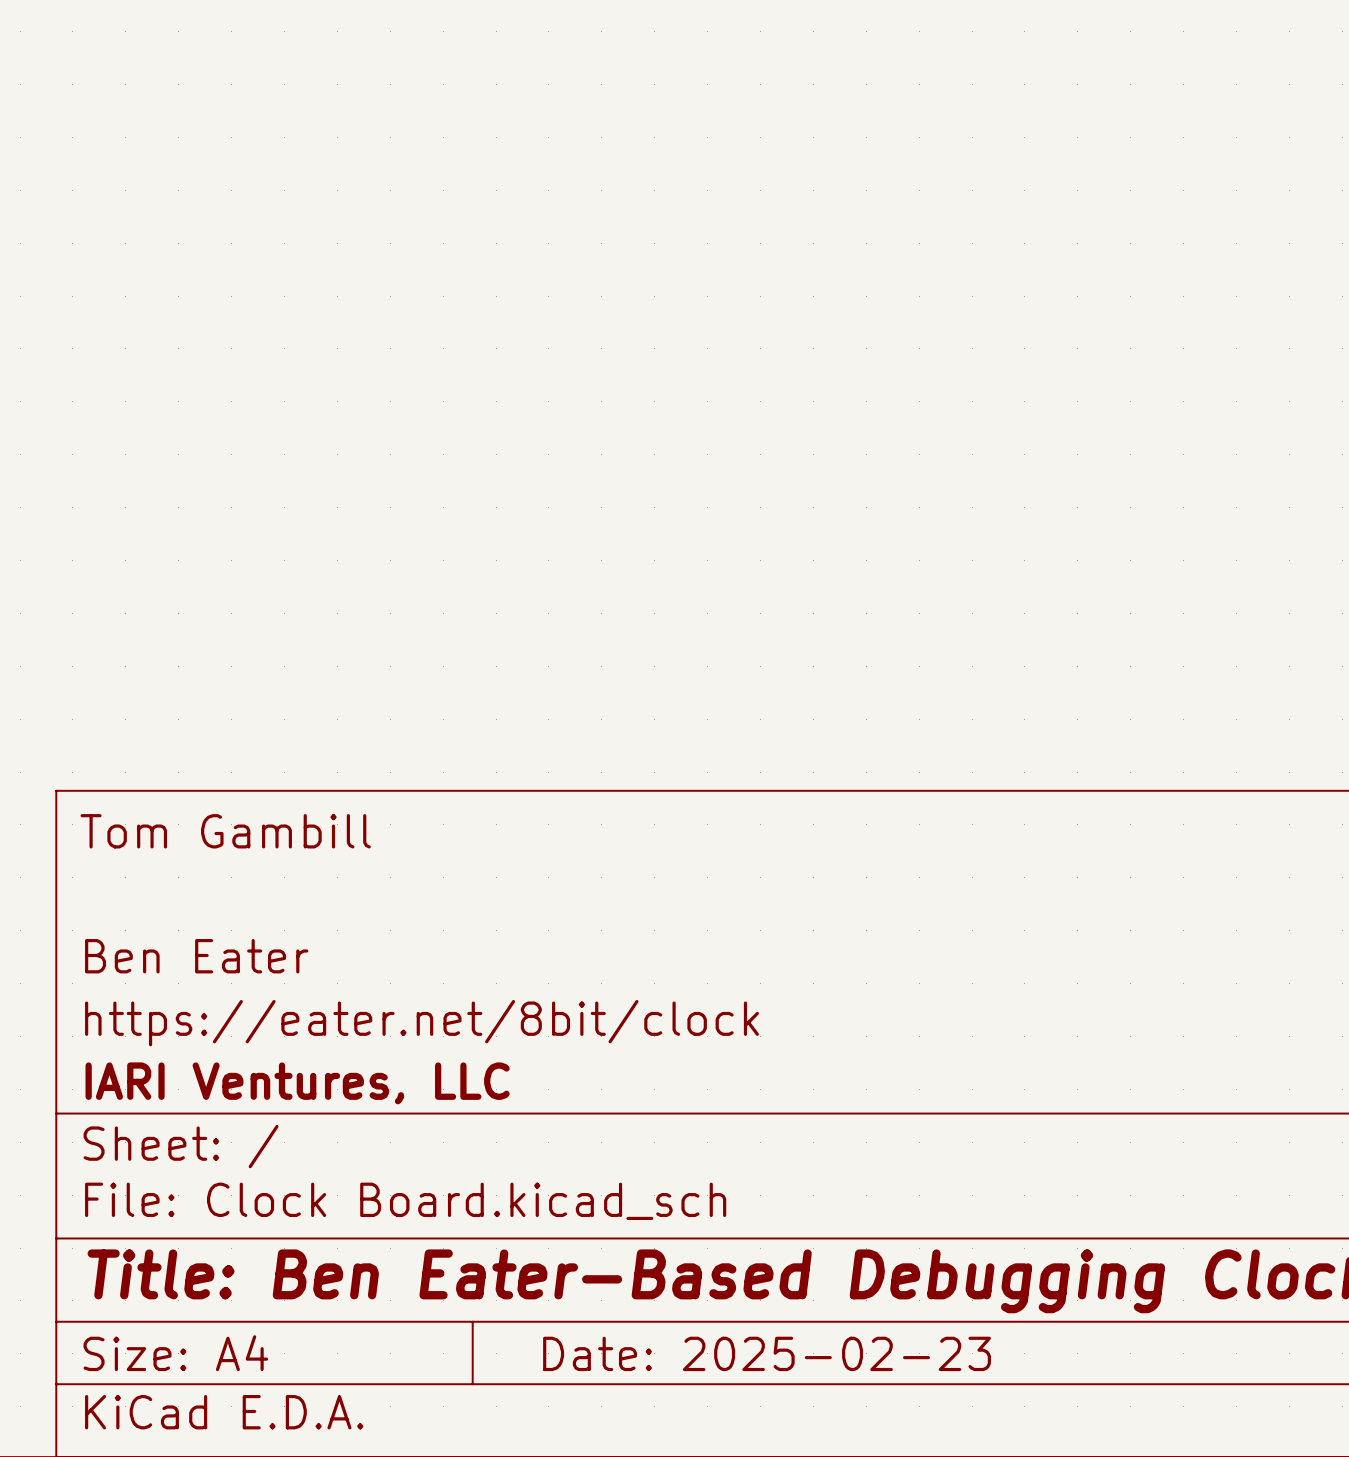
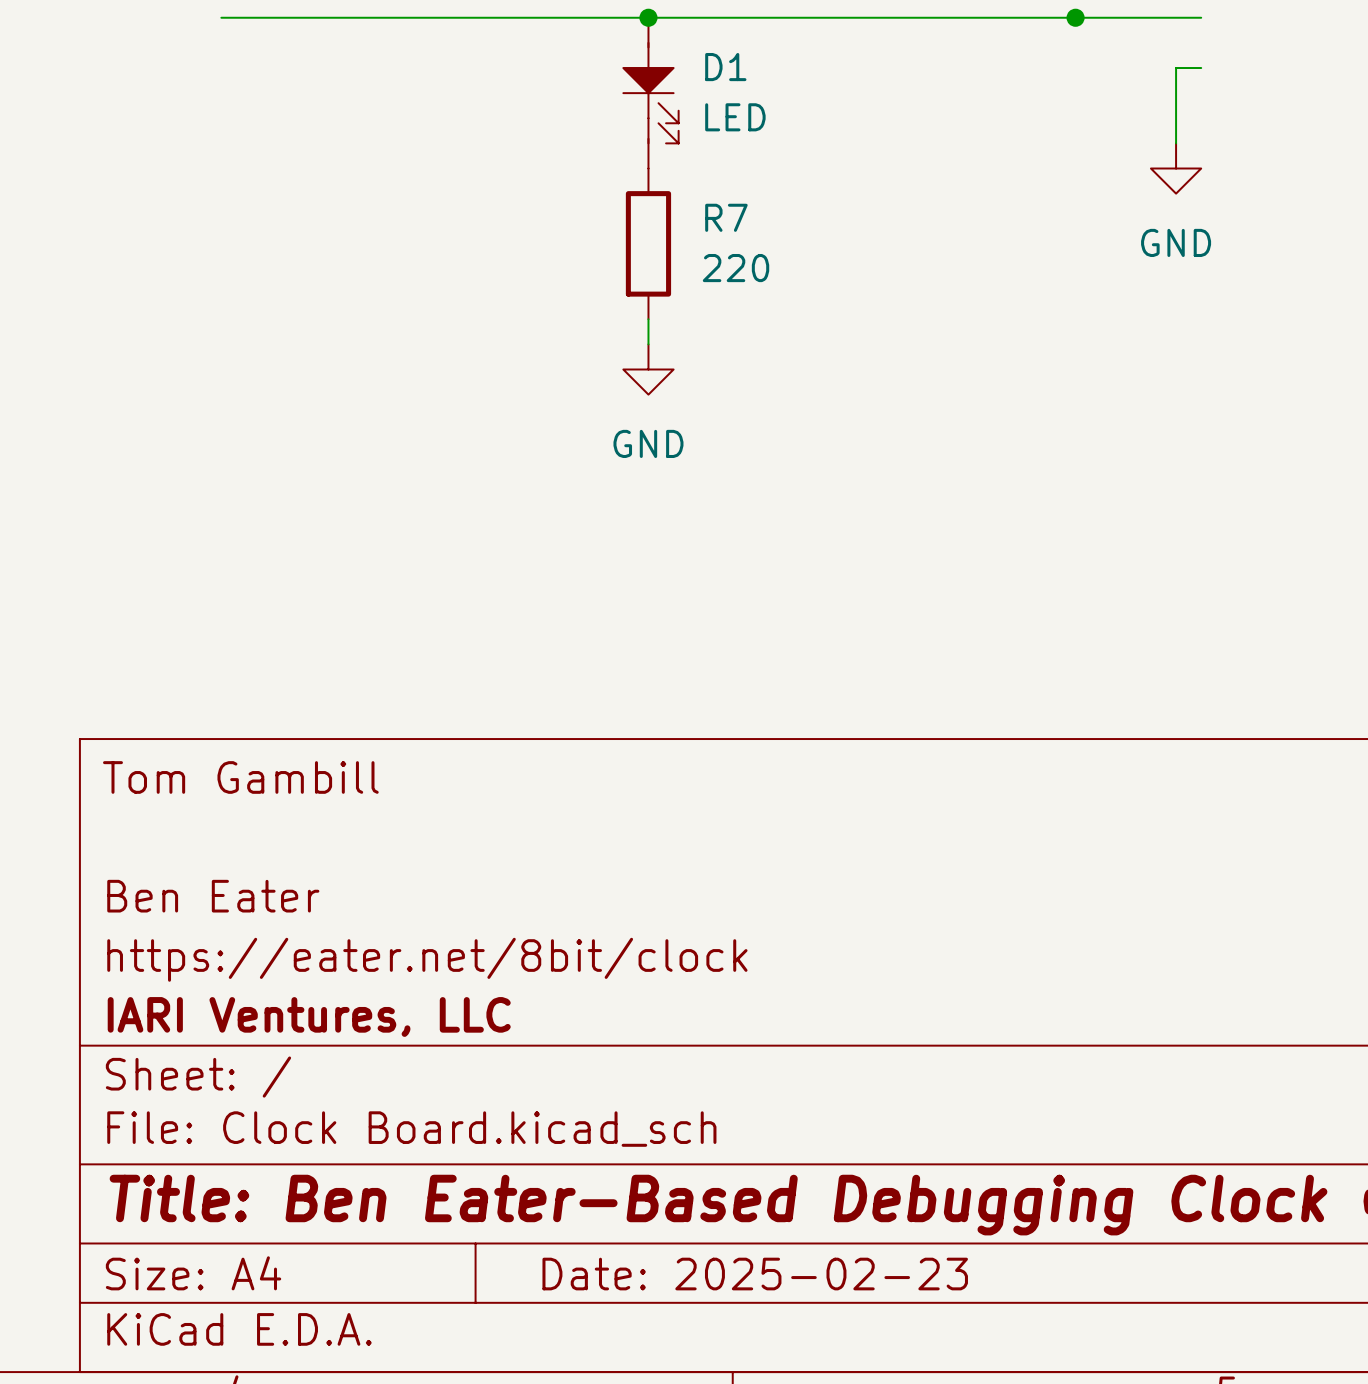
wire: none -> (221, 17) (1201, 17)
junction: none -> (648, 17)
junction: none -> (1075, 17)
wire: none -> (1201, 68) (1176, 68) (1176, 143)
D1: none -> LED (650, 93)
power symbol: none -> GND (1176, 168)
R7: none -> 220 (648, 243)
wire: none -> (648, 319) (648, 344)
power symbol: none -> GND (648, 369)

